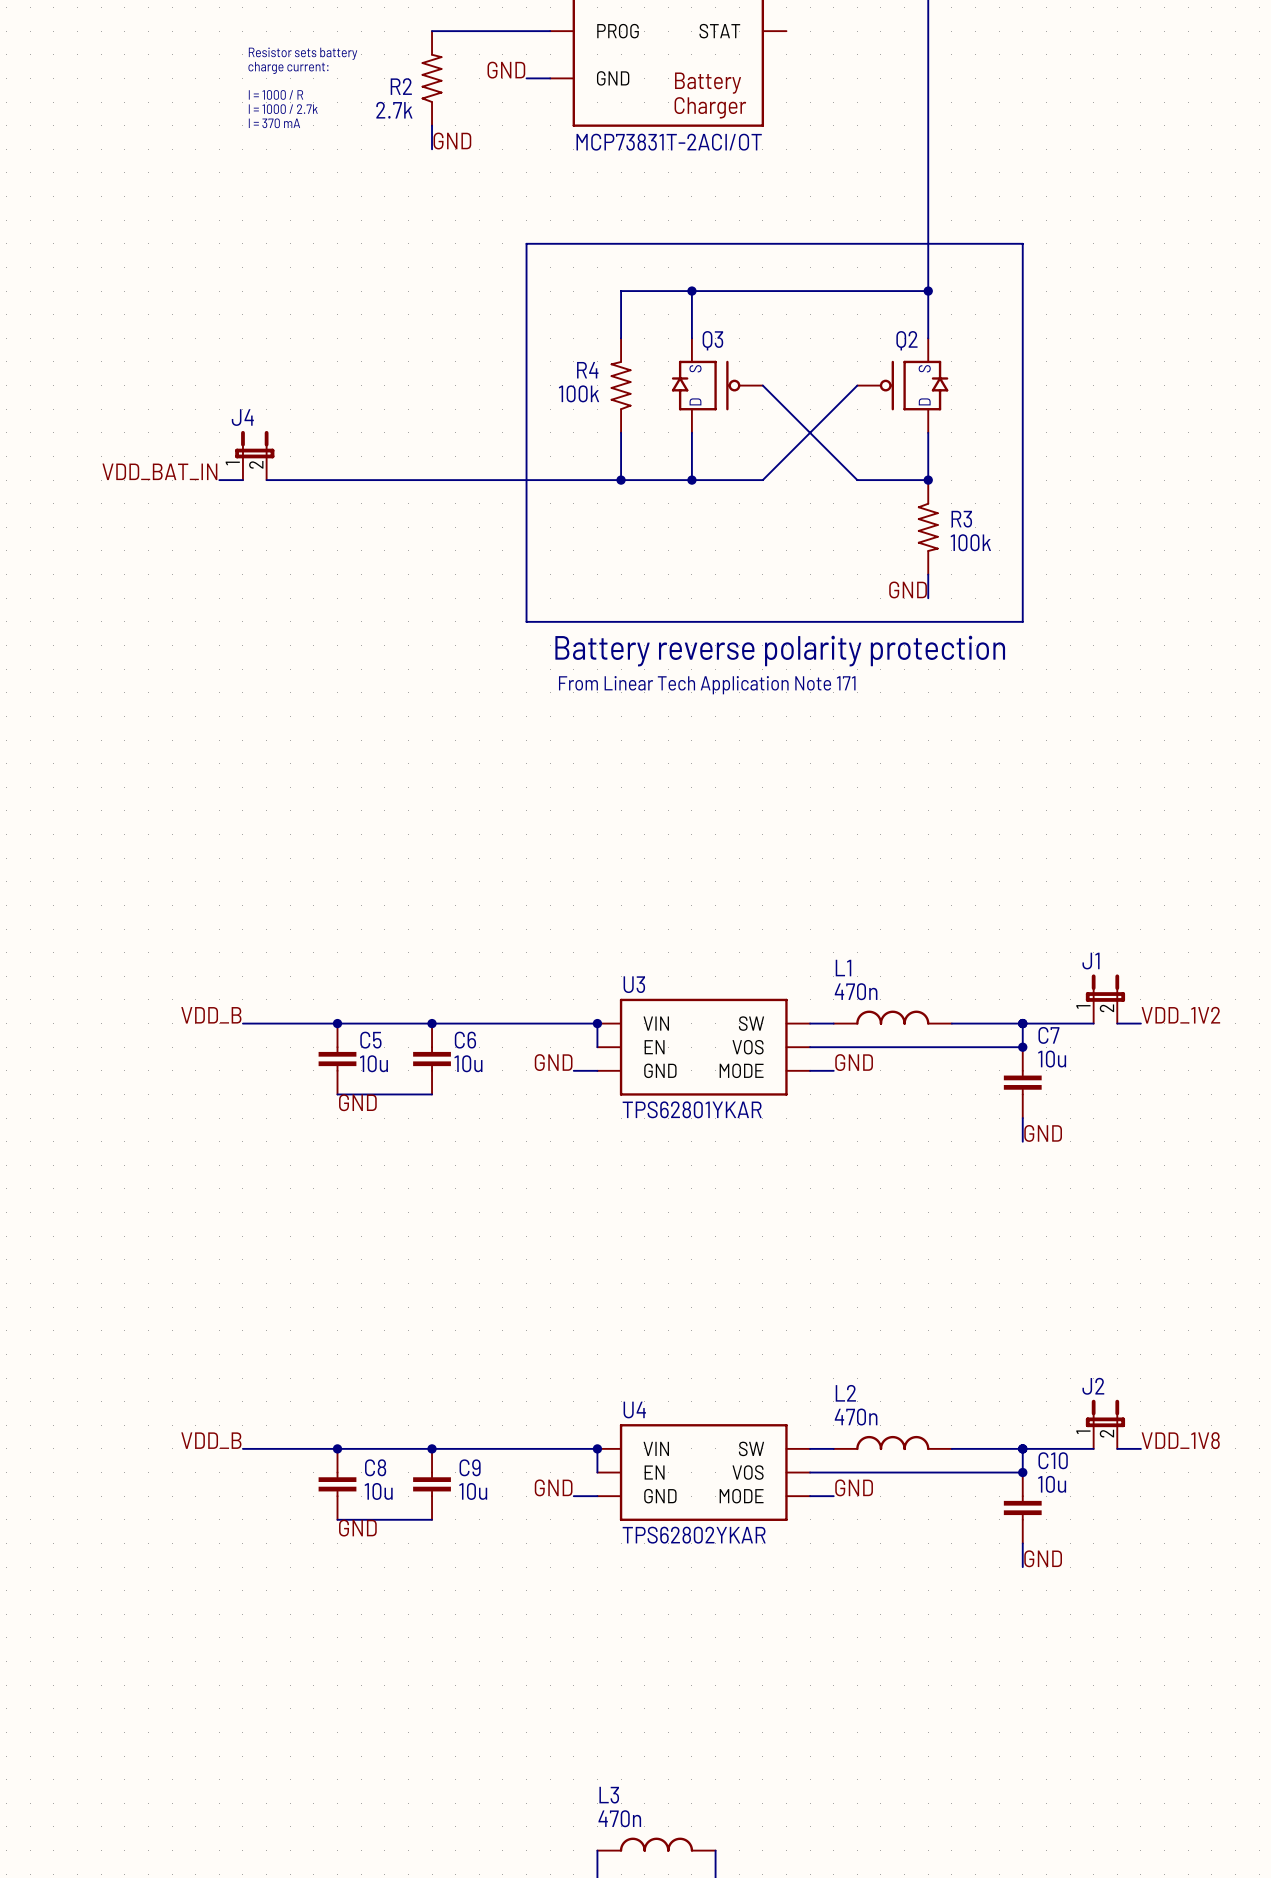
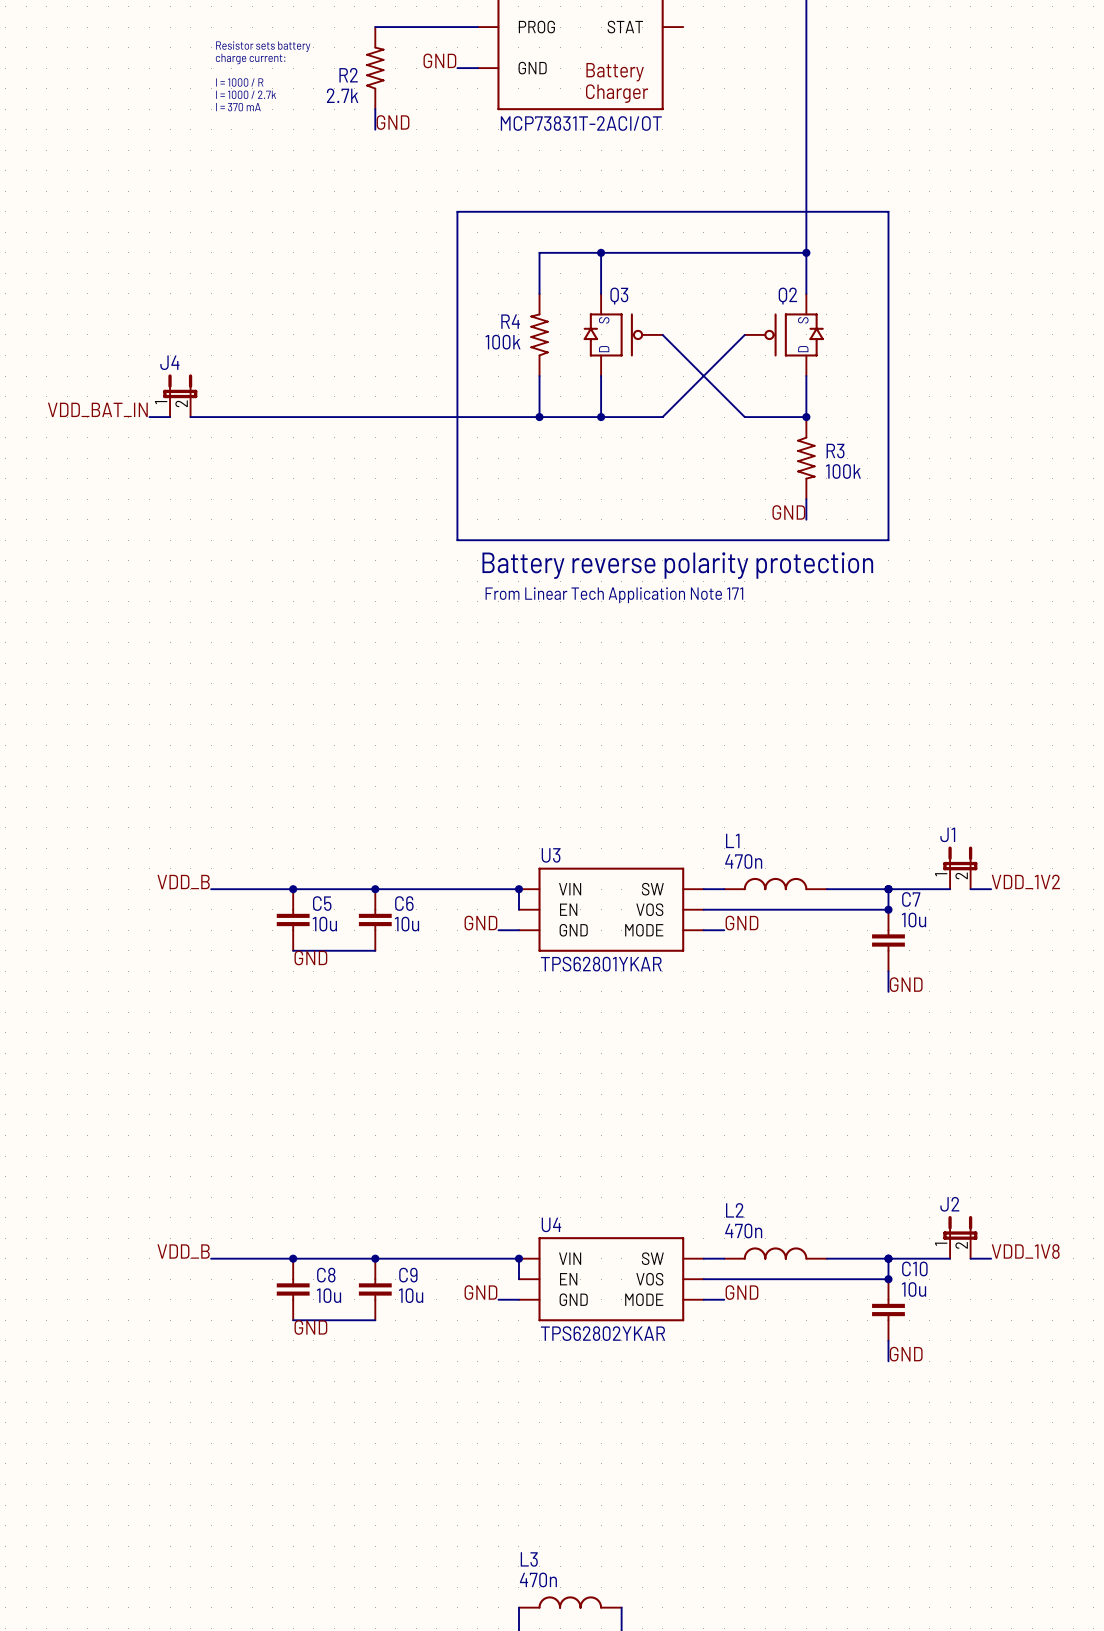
J4 position: (254, 455) -> (180, 395)
label position: VDD_BAT_IN (159, 471) -> VDD_BAT_IN (97, 409)
wire: none -> (149, 417) (170, 417)
wire: none -> (211, 417) (231, 417)

